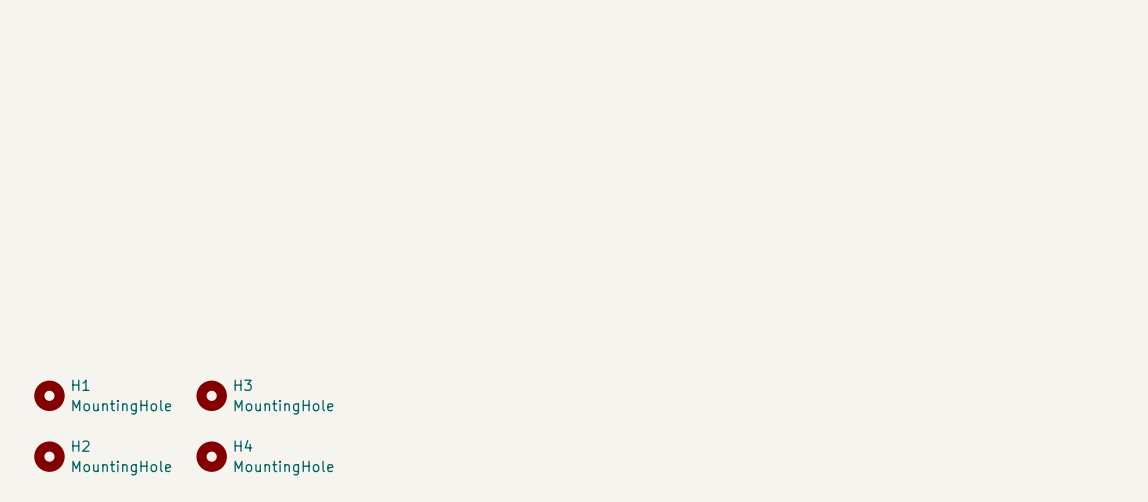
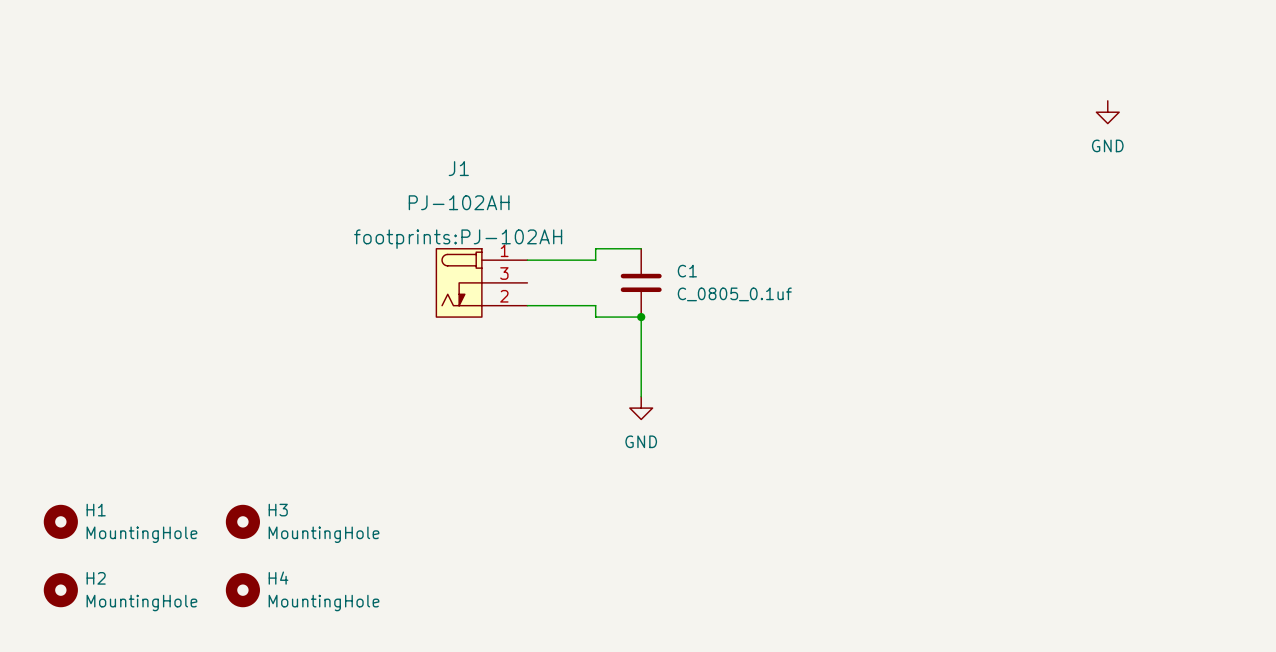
power symbol: none -> GND (1107, 112)
wire: none -> (641, 248) (595, 248) (595, 260) (527, 260)
J1: none -> PJ-102AH (481, 282)
C1: none -> C_0805_0.1uf (641, 282)
wire: none -> (527, 305) (595, 305) (595, 317) (641, 317) (641, 396)
junction: none -> (641, 317)
power symbol: none -> GND (641, 408)

